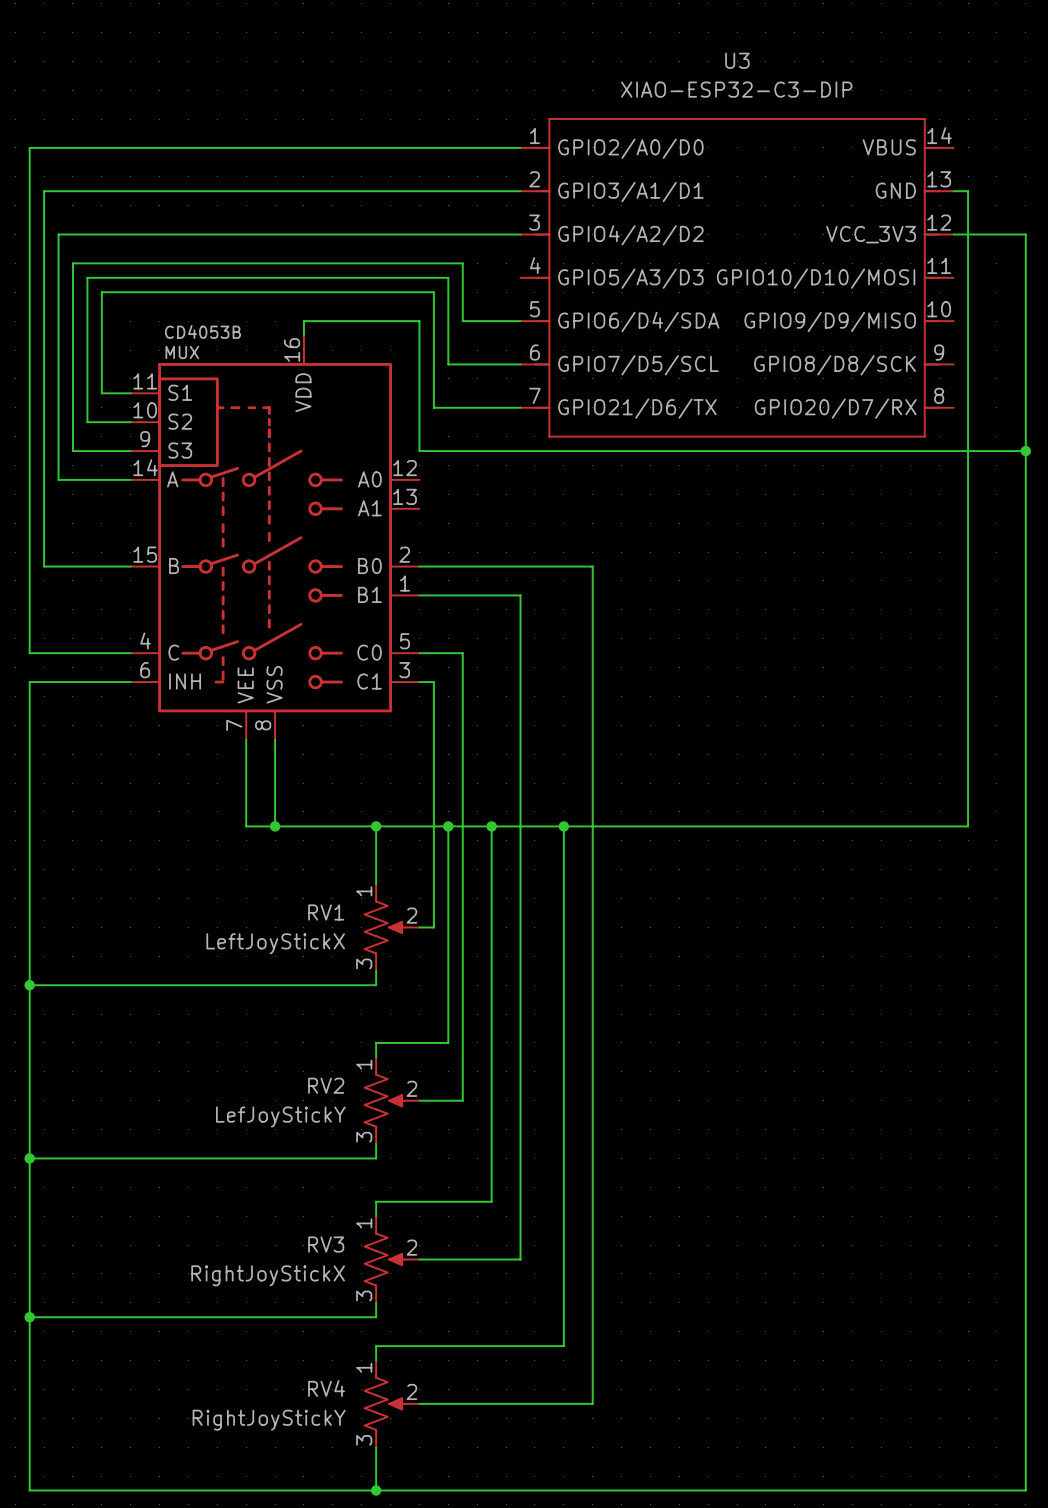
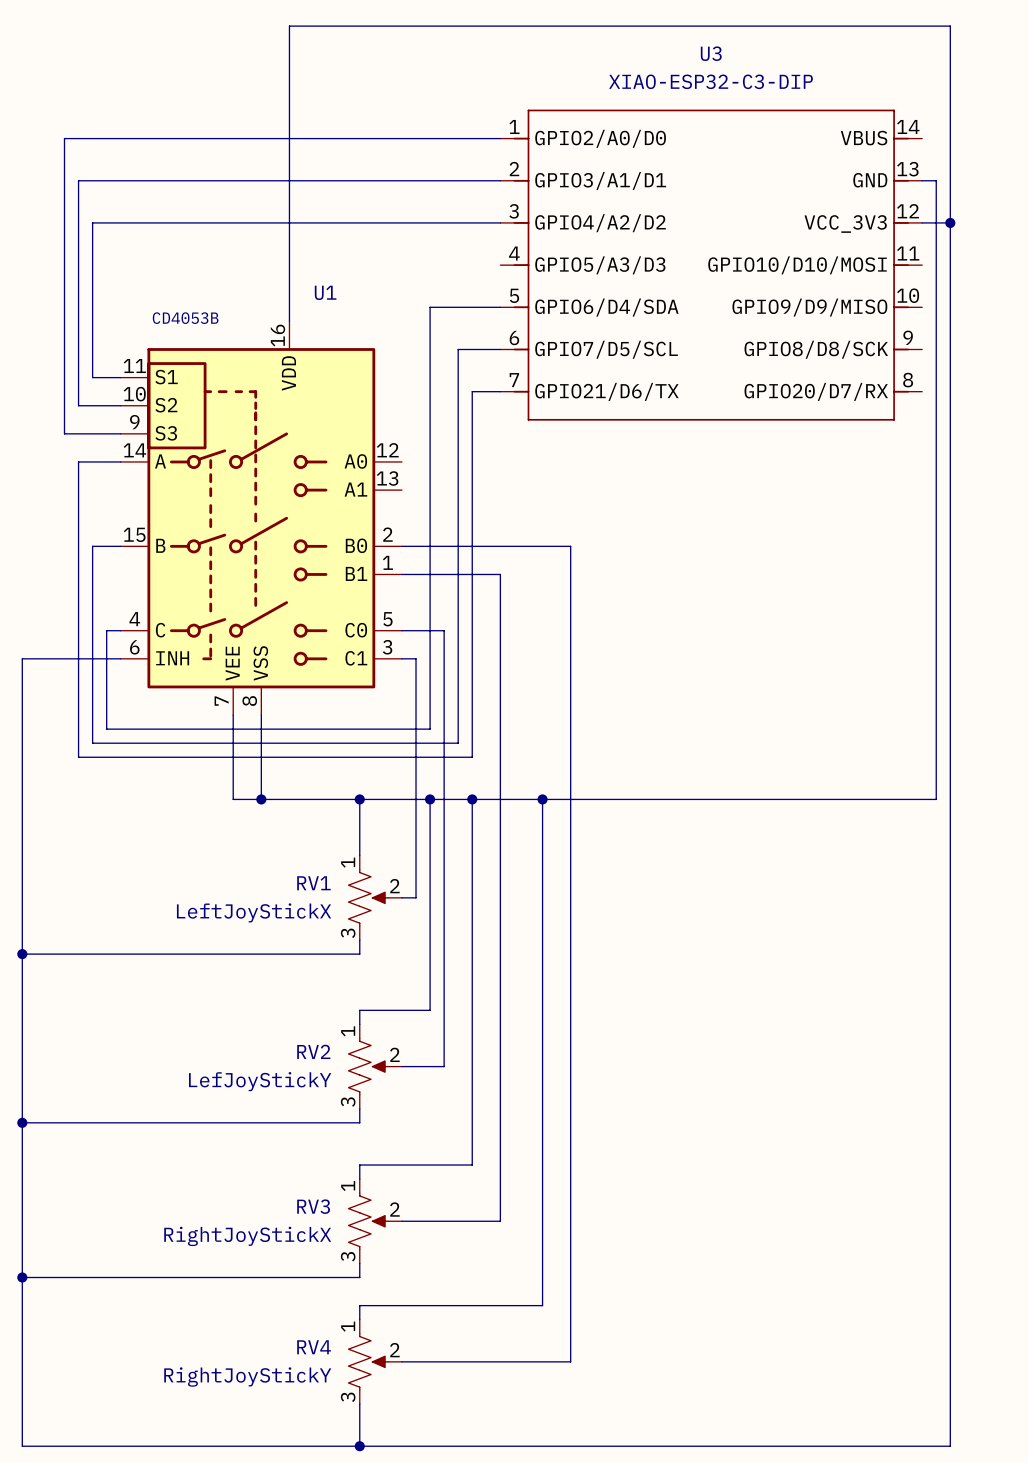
wire: (72, 147) (29, 147) (29, 653) (116, 653) -> (64, 138) (64, 251)
wire: (87, 191) (44, 191) (44, 566) (101, 566) -> (78, 180) (78, 265)
wire: (101, 234) (58, 234) (58, 479) (87, 479) -> (92, 222) (92, 279)
wire: (982, 234) (1025, 234) (1025, 1490) (982, 1490) -> (289, 307) (289, 26) (950, 26) (950, 1446)
junction: none -> (950, 222)
wire: (72, 263) (462, 263) (462, 321) -> none
wire: (87, 277) (448, 277) (448, 321) -> (444, 307) (430, 307)
wire: (101, 292) (433, 292) (433, 407) (491, 407) -> (78, 461) (78, 757) (472, 757) (472, 391)
wire: (303, 321) (419, 321) (419, 451) (1025, 451) -> none
MUX name: MUX (182, 352) -> U1 (325, 292)
wire: (448, 364) (477, 364) -> (92, 546) (92, 743) (458, 743) (458, 349)
wire: none -> (430, 349) (430, 729) (106, 729) (106, 630)
junction: (1025, 451) -> none

